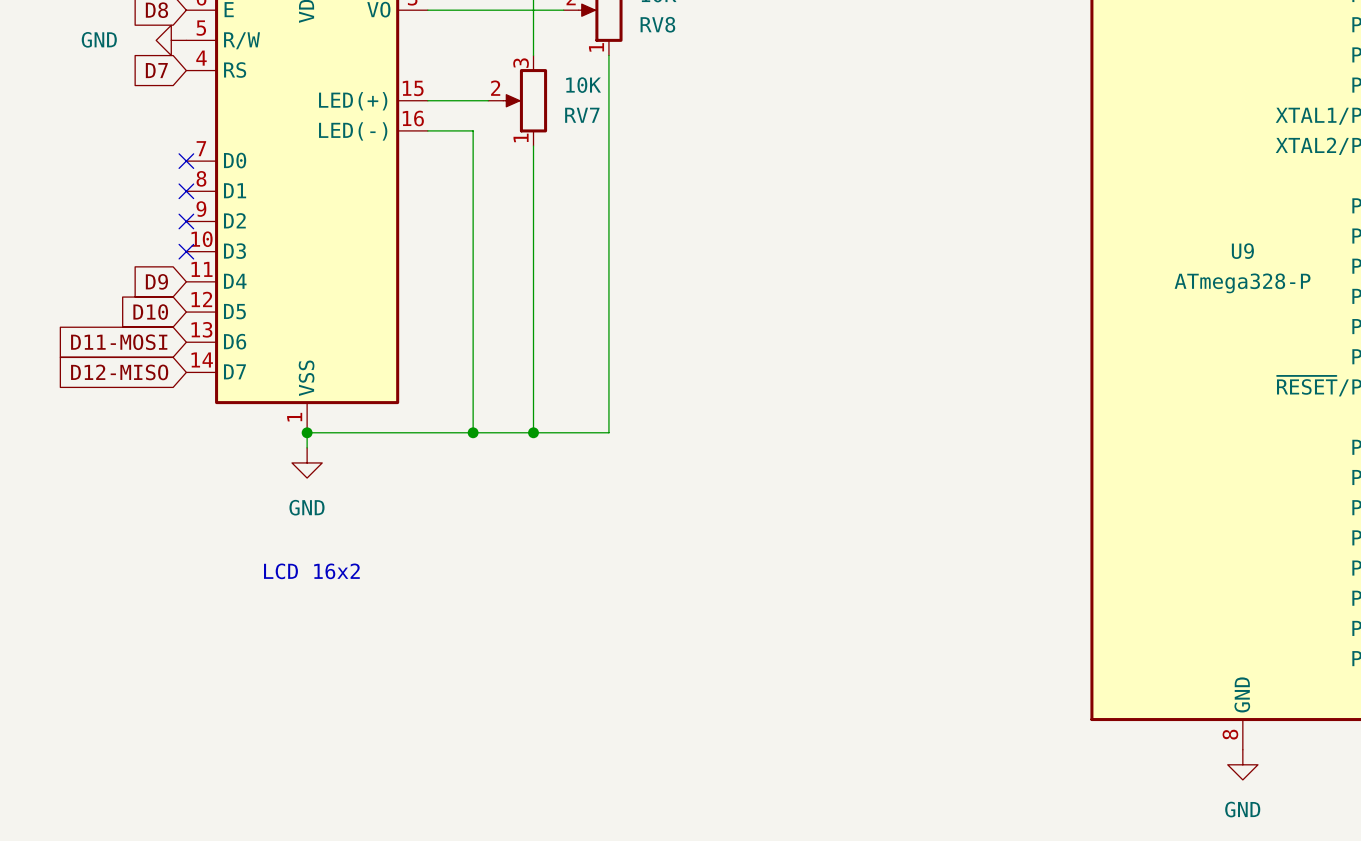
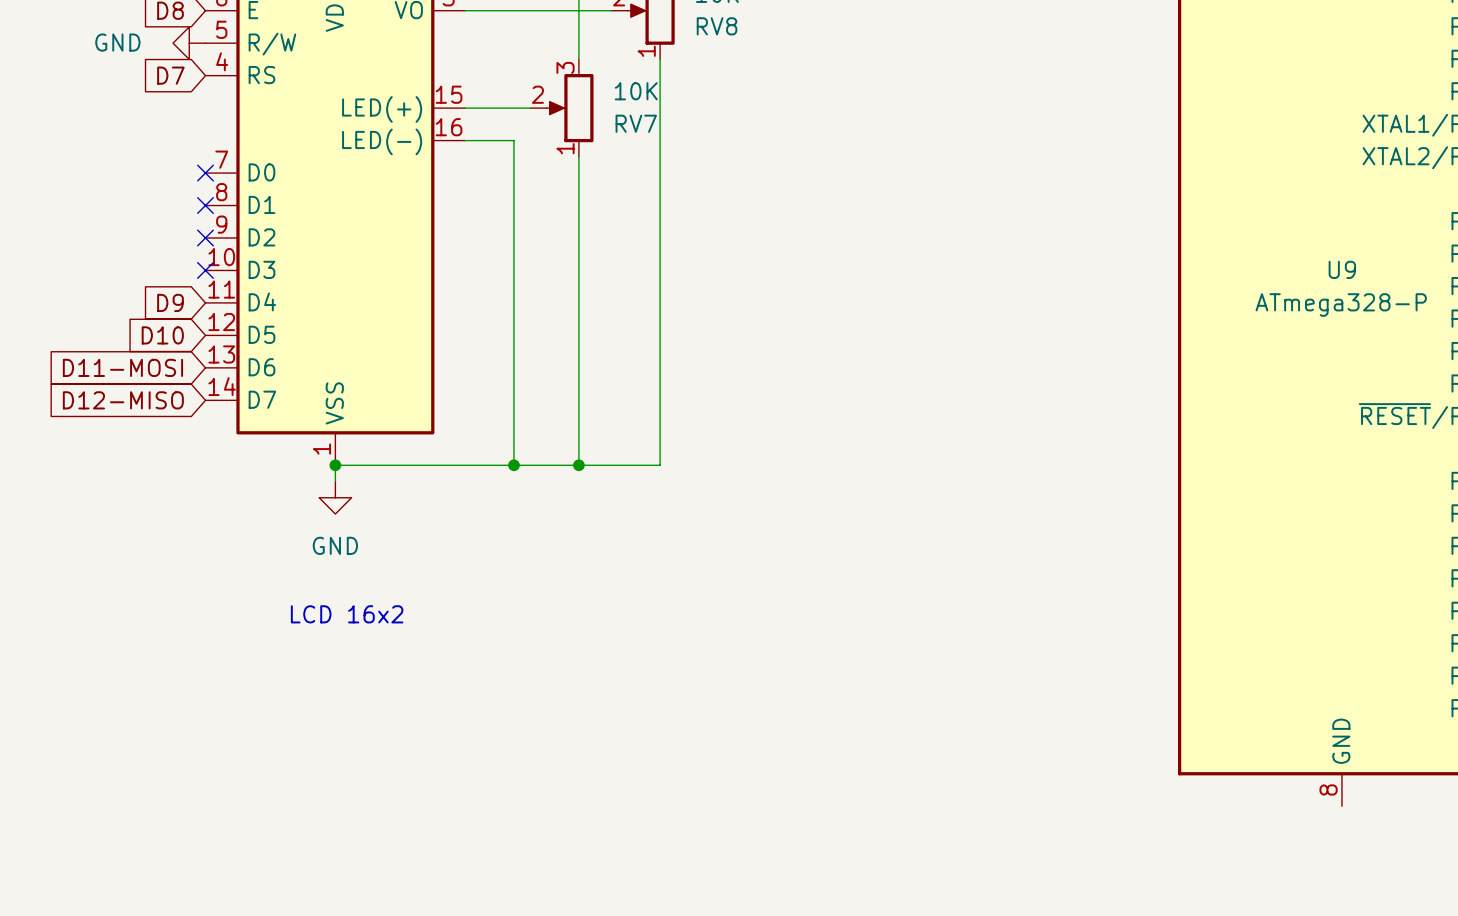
power symbol: GND (1242, 764) -> none

